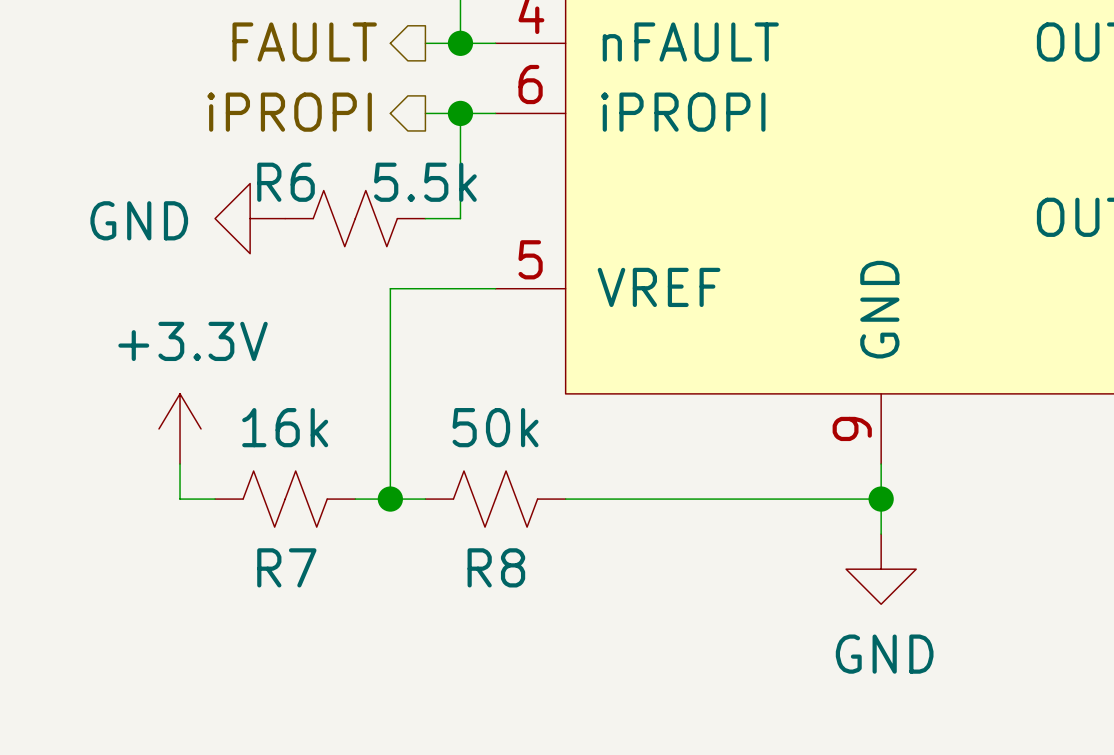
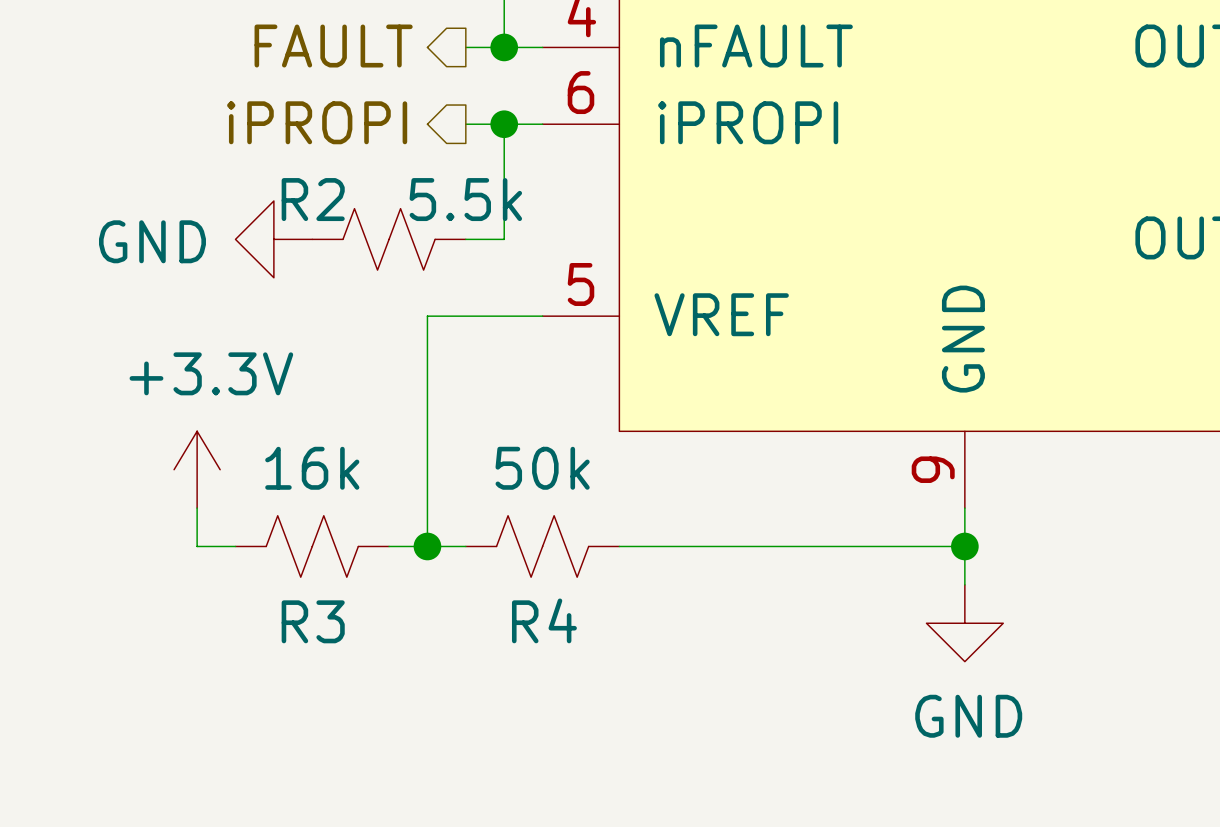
R6 name: R6 (286, 182) -> R2 (313, 199)
R7 name: R7 (286, 567) -> R3 (313, 621)
R8 name: R8 (496, 567) -> R4 (544, 620)

